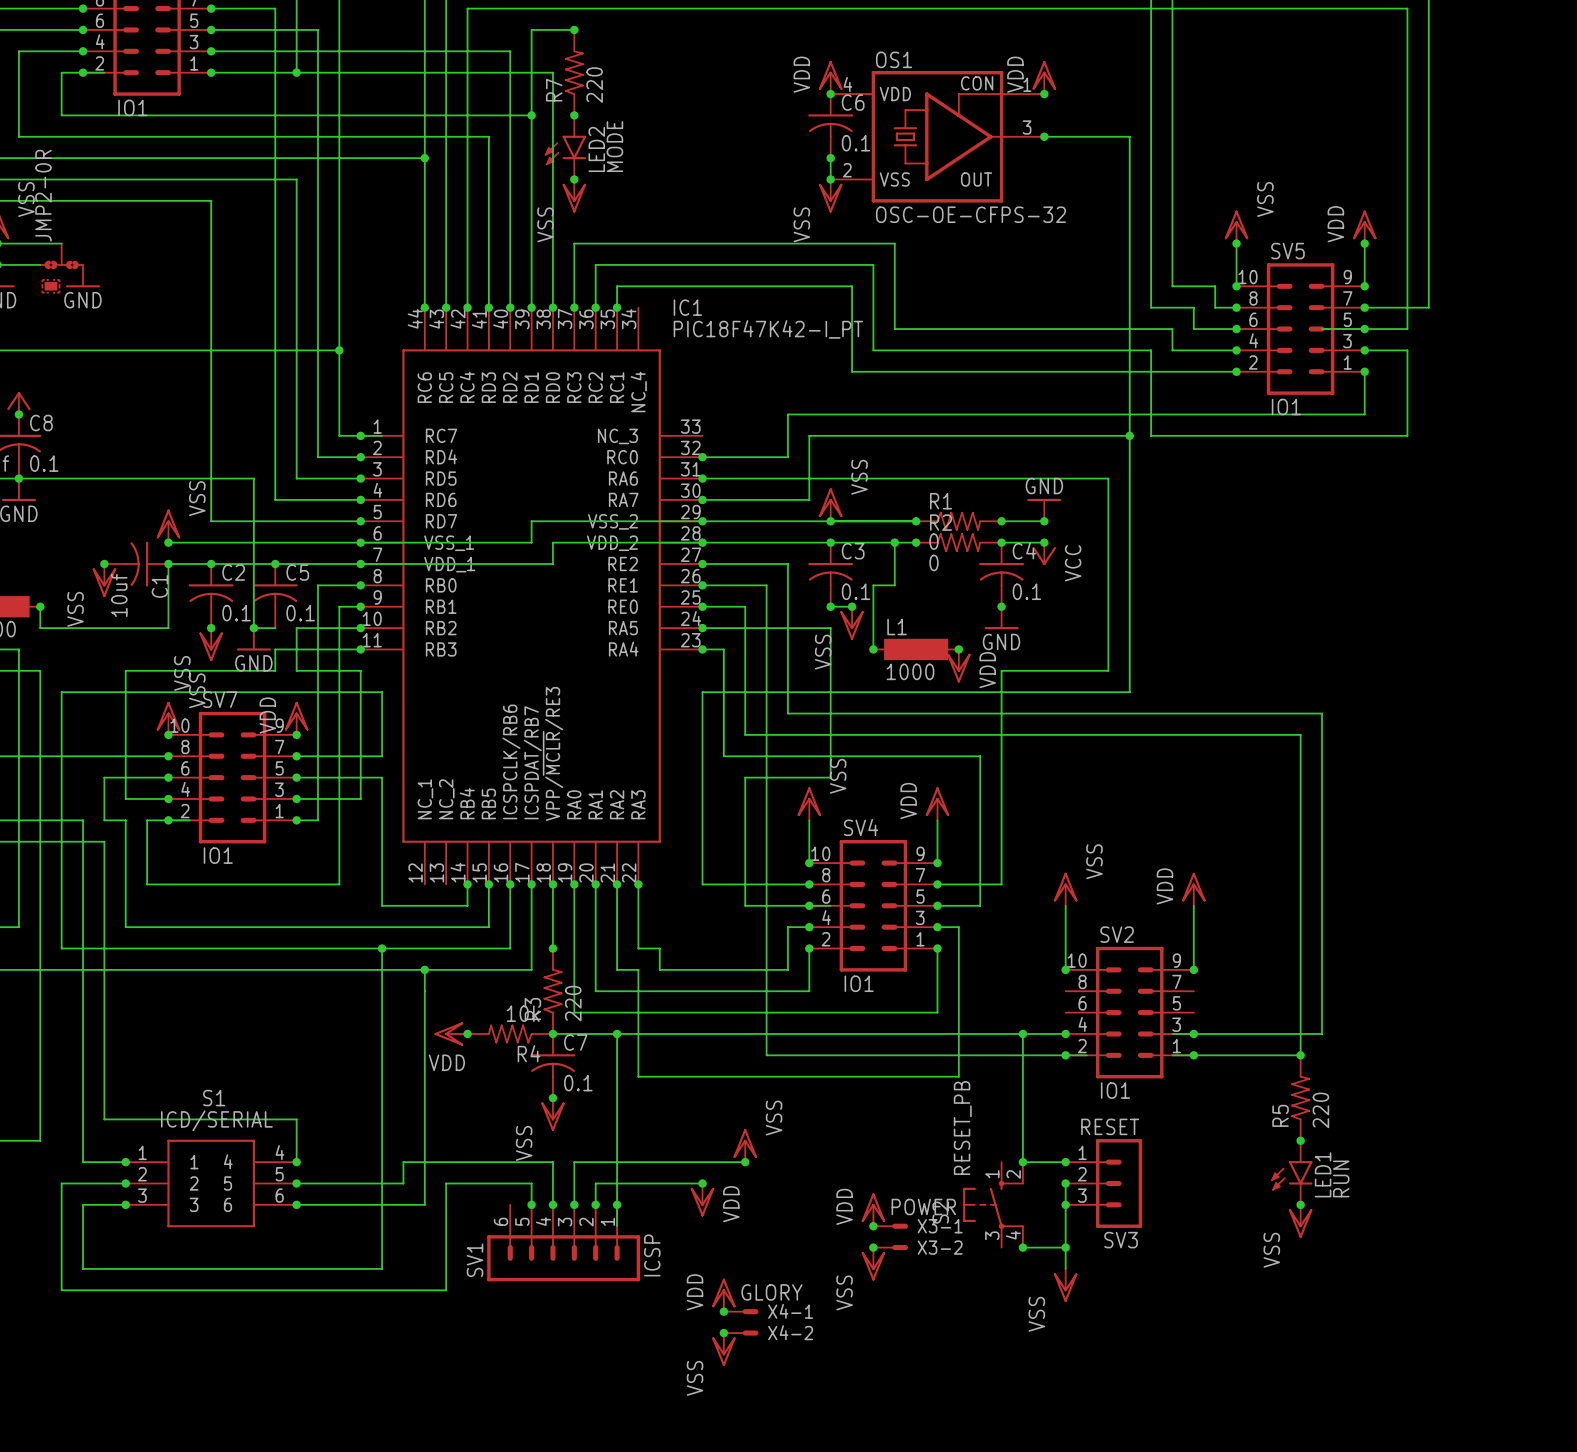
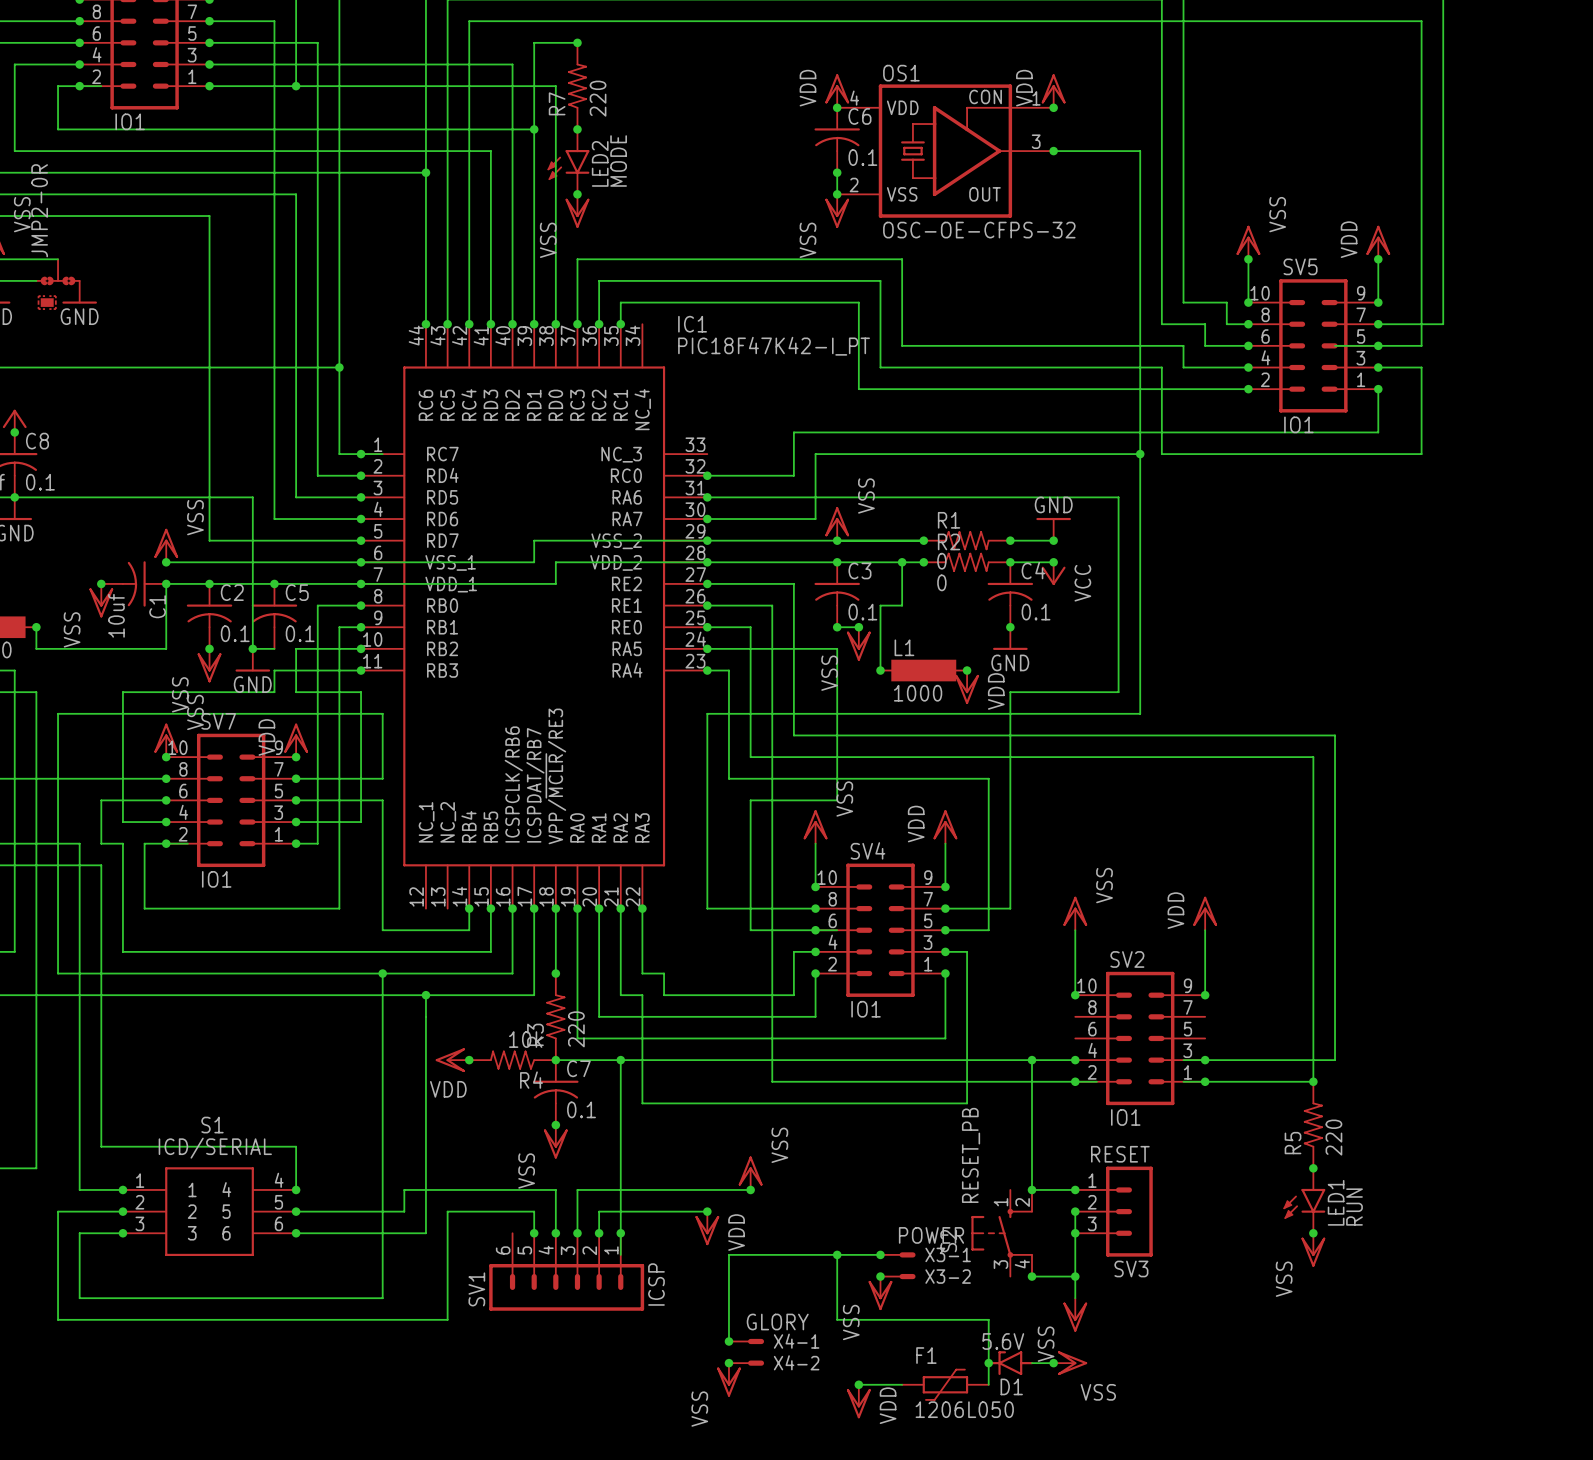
power symbol: VDD (873, 1209) -> none
wire: none -> (837, 1254) (837, 1319) (988, 1319) (988, 1384)
junction: none -> (837, 1254)
wire: none -> (880, 1254) (728, 1254) (728, 1341)
power symbol: VDD (723, 1295) -> none
junction: none -> (988, 1363)
D1: none -> 5.6V (1010, 1363)
wire: none -> (1032, 1363) (1053, 1363)
junction: none -> (1053, 1363)
power symbol: none -> VSS (1070, 1363)
wire: none -> (858, 1384) (902, 1384)
junction: none -> (858, 1384)
F1: none -> 1206L050 (945, 1384)
power symbol: none -> VDD (858, 1401)

